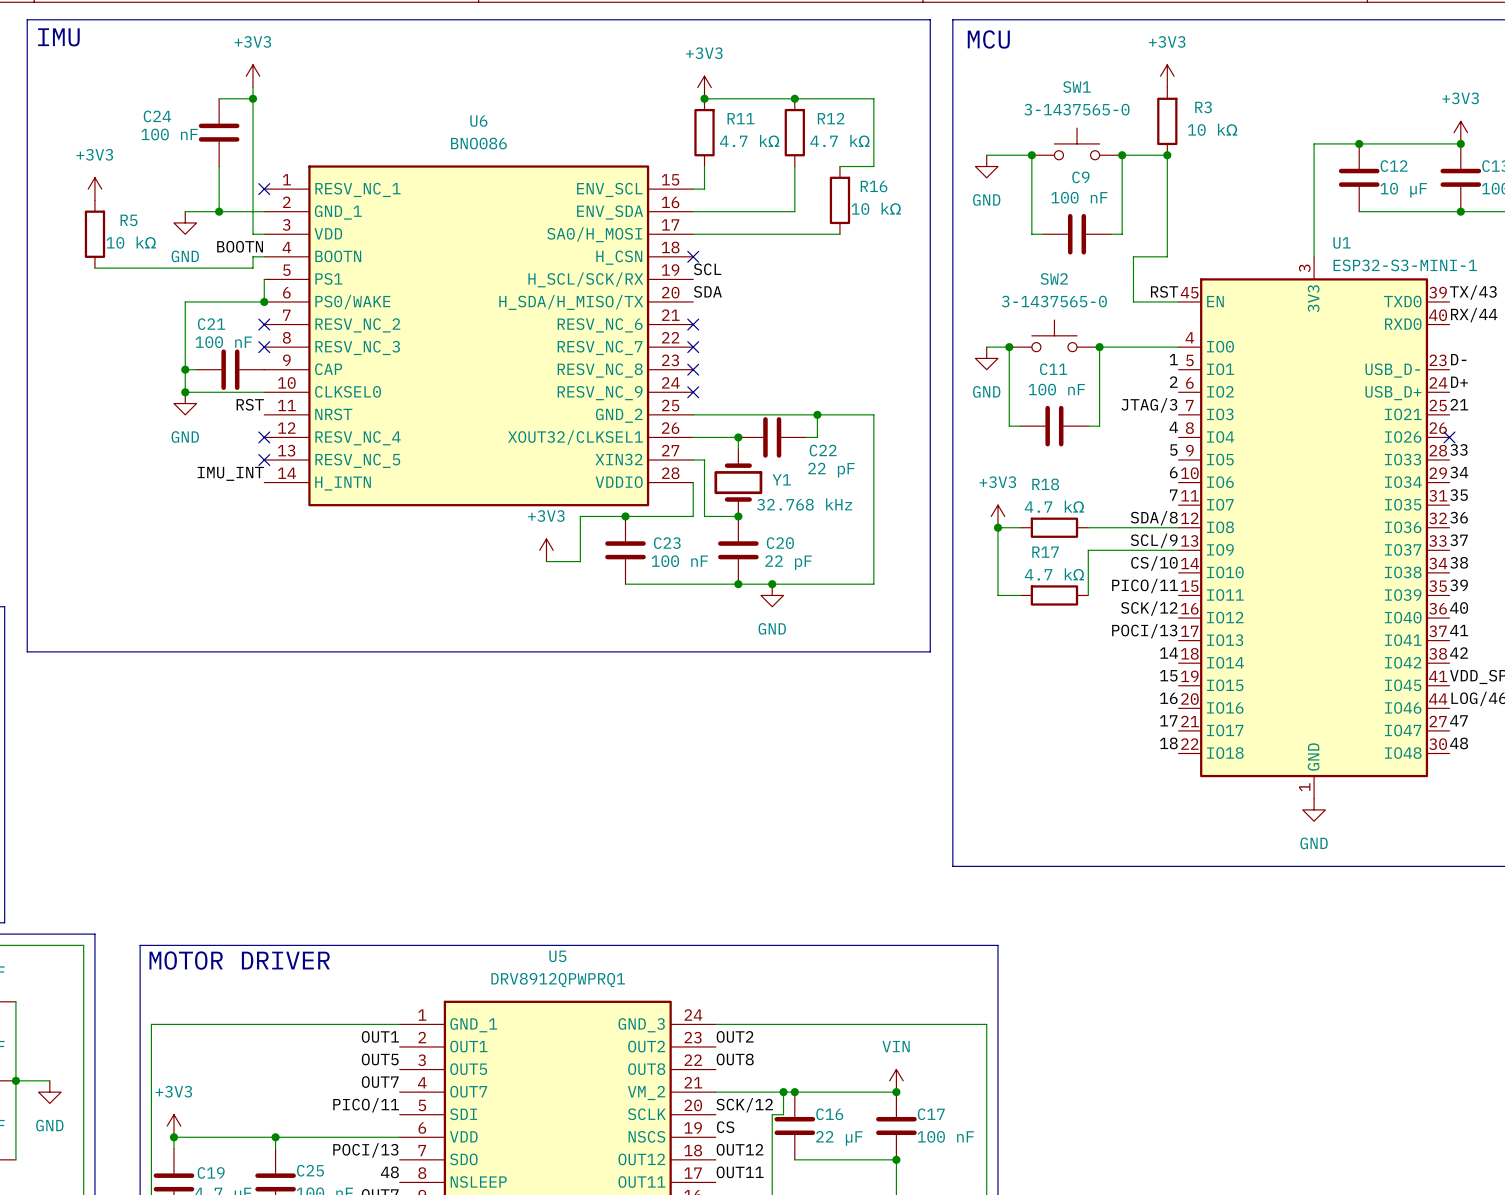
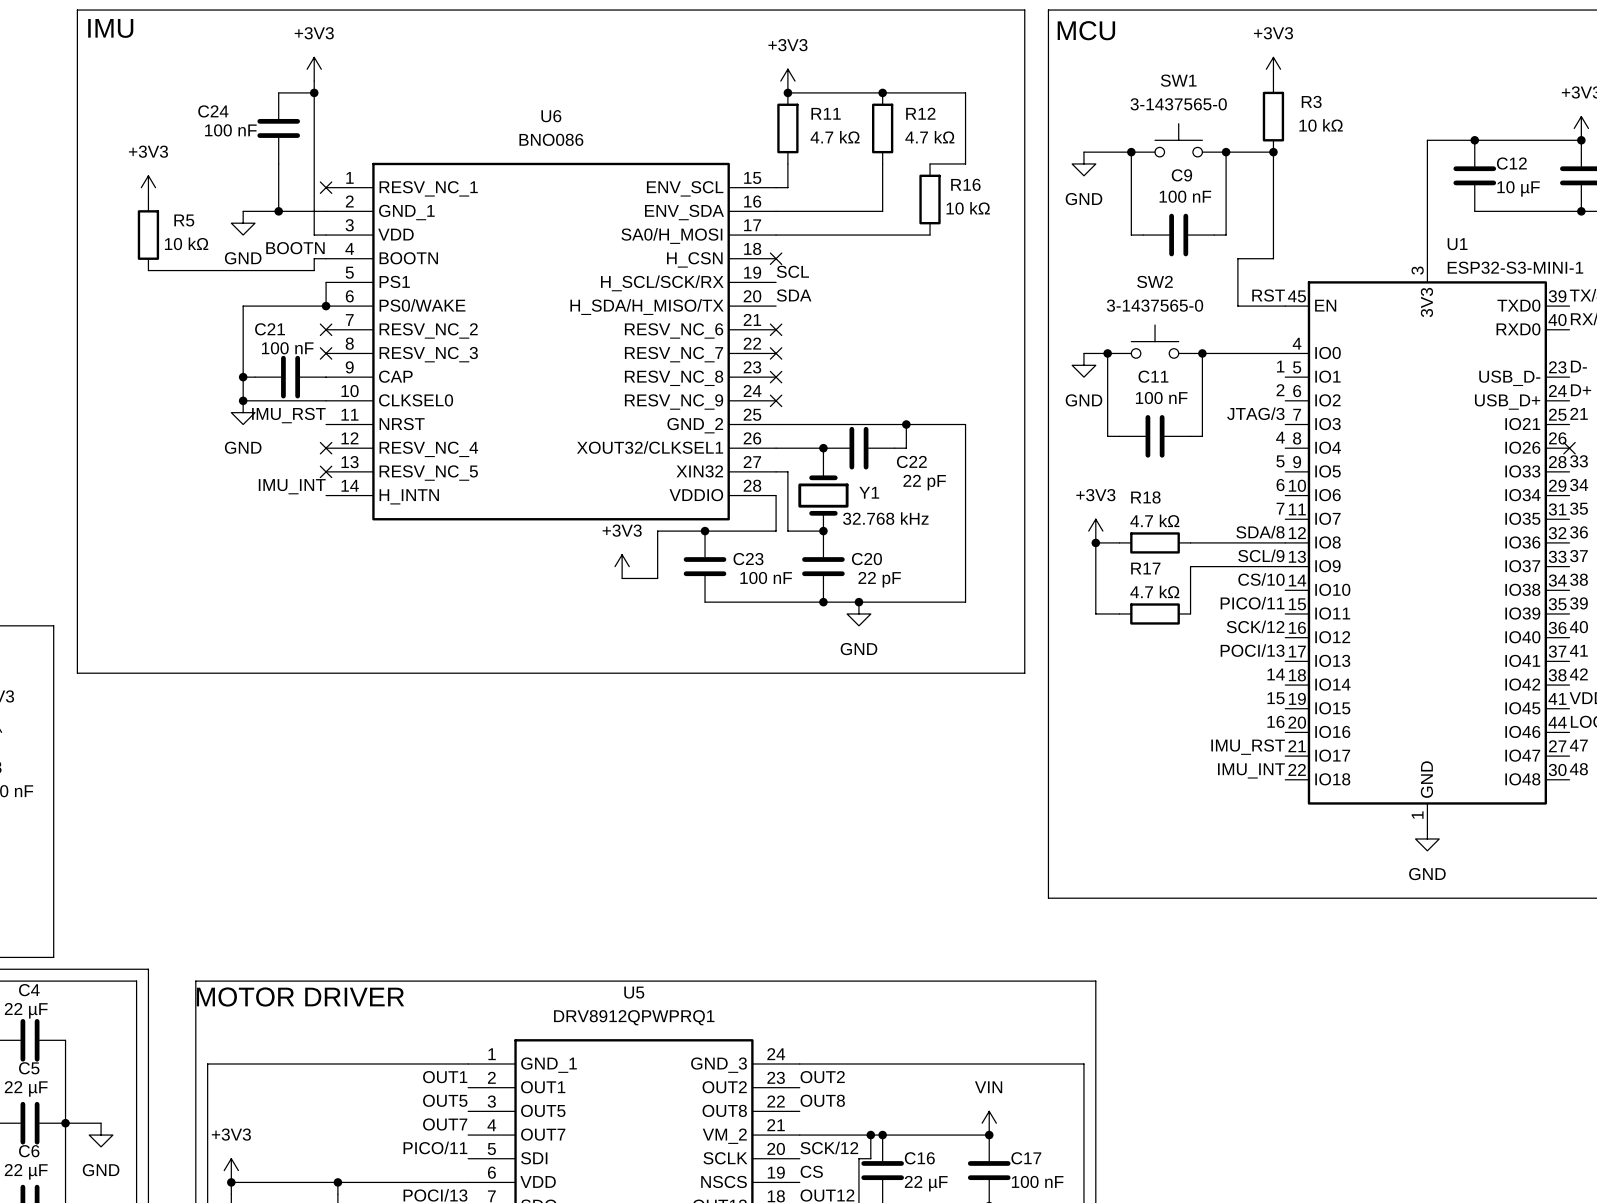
label: RST (250, 404) -> IMU_RST (288, 415)
label: 17 (1168, 720) -> IMU_RST (1248, 747)
label: 18 (1168, 743) -> IMU_INT (1251, 770)

